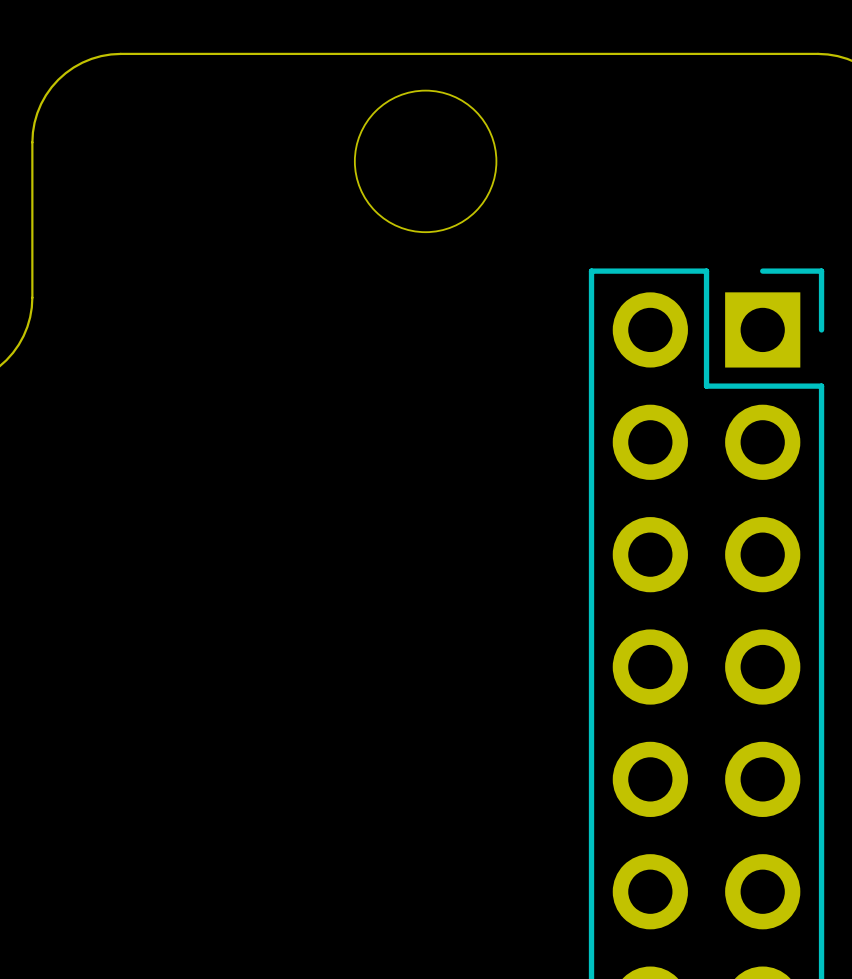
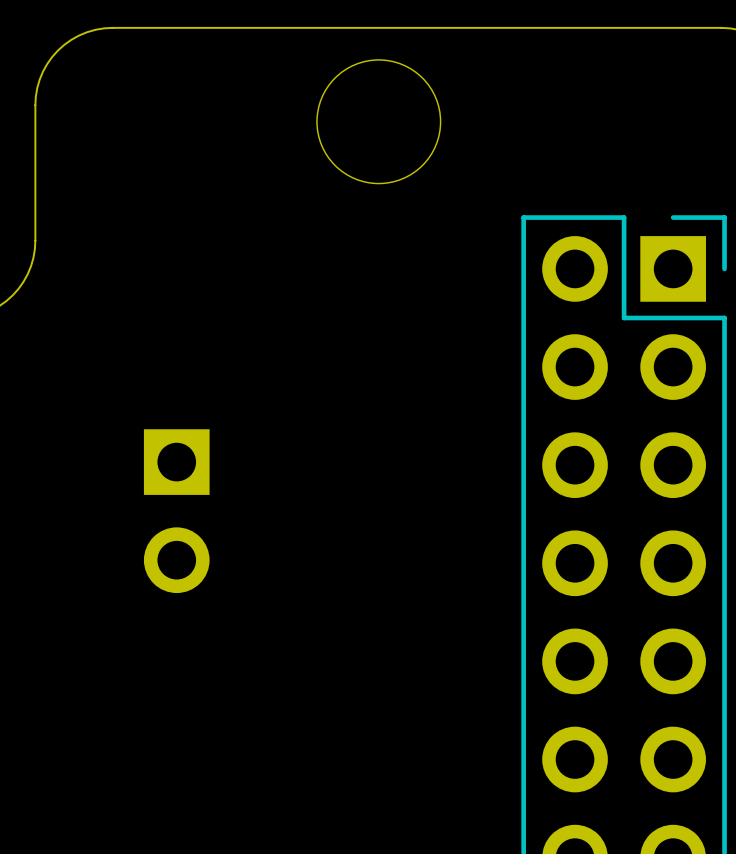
part: none -> (176, 511)

